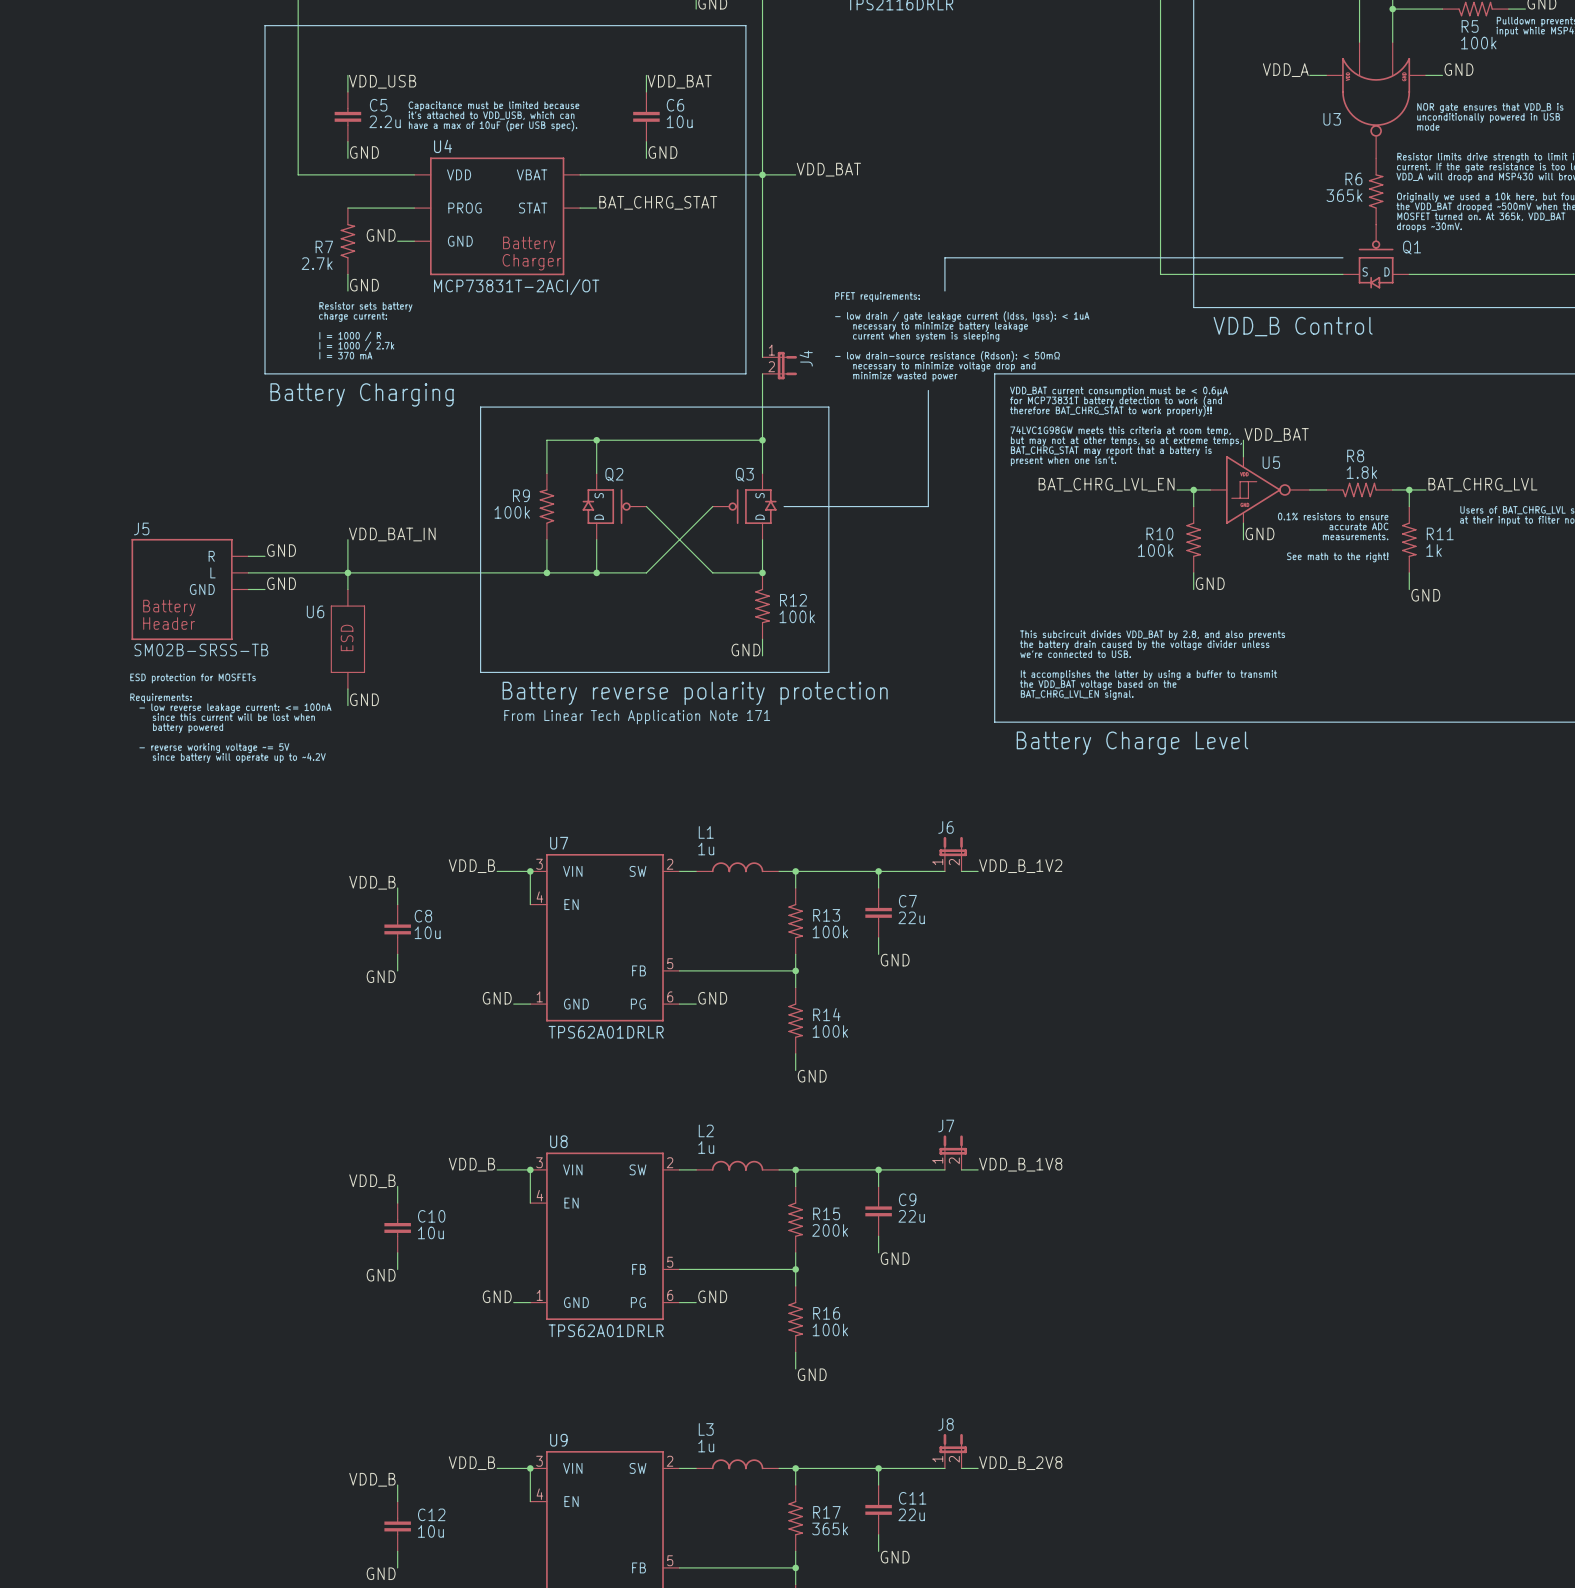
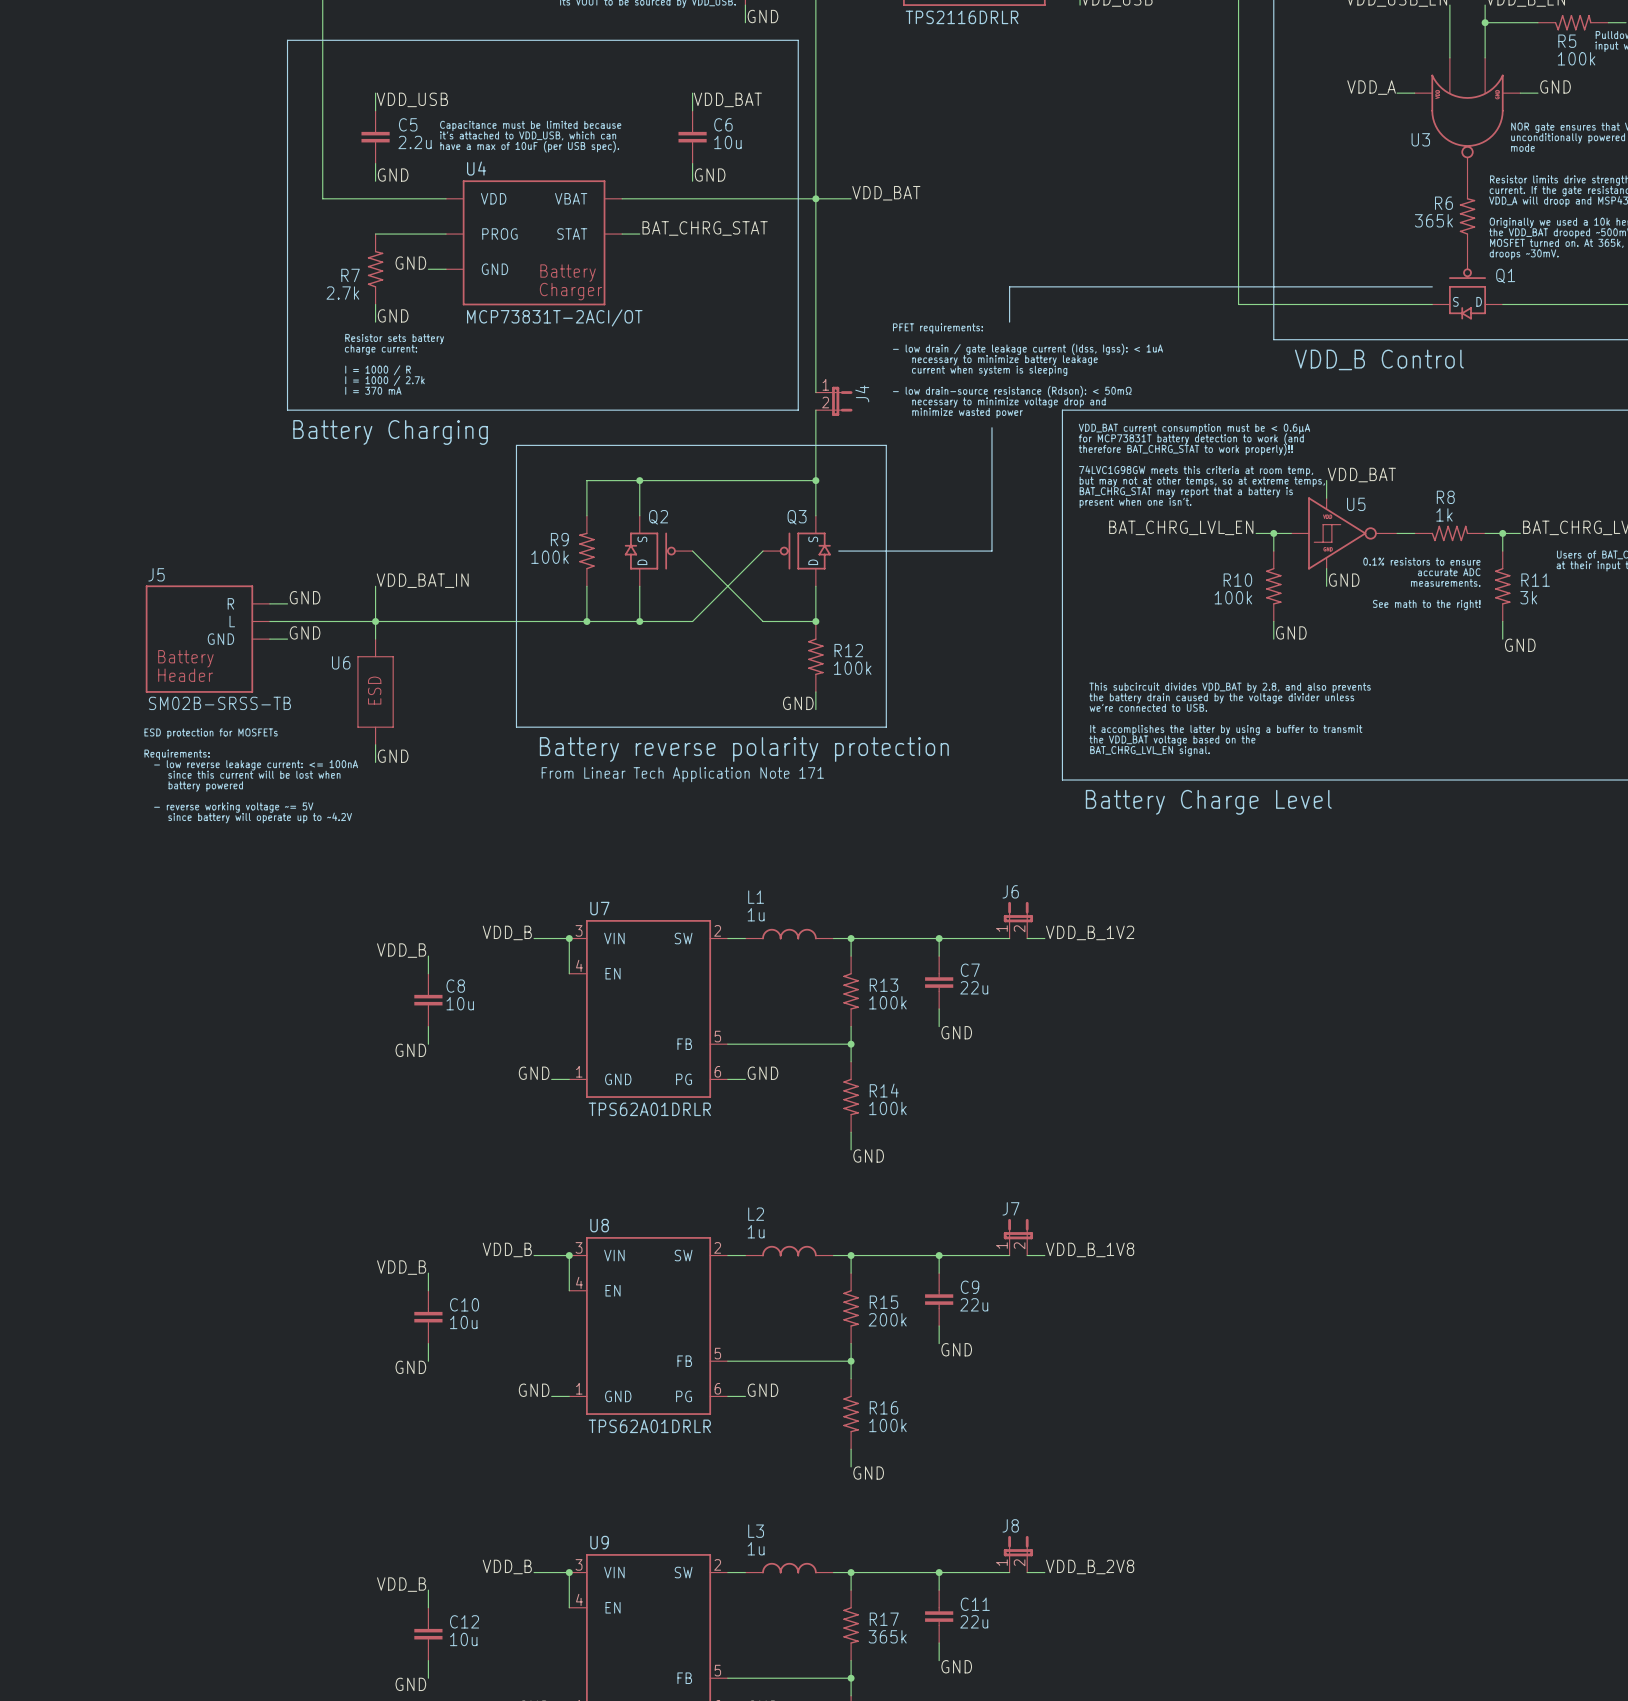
R8 value: 1.8k (1361, 472) -> 1k (1444, 514)
R11 value: 1k (1434, 550) -> 3k (1528, 597)

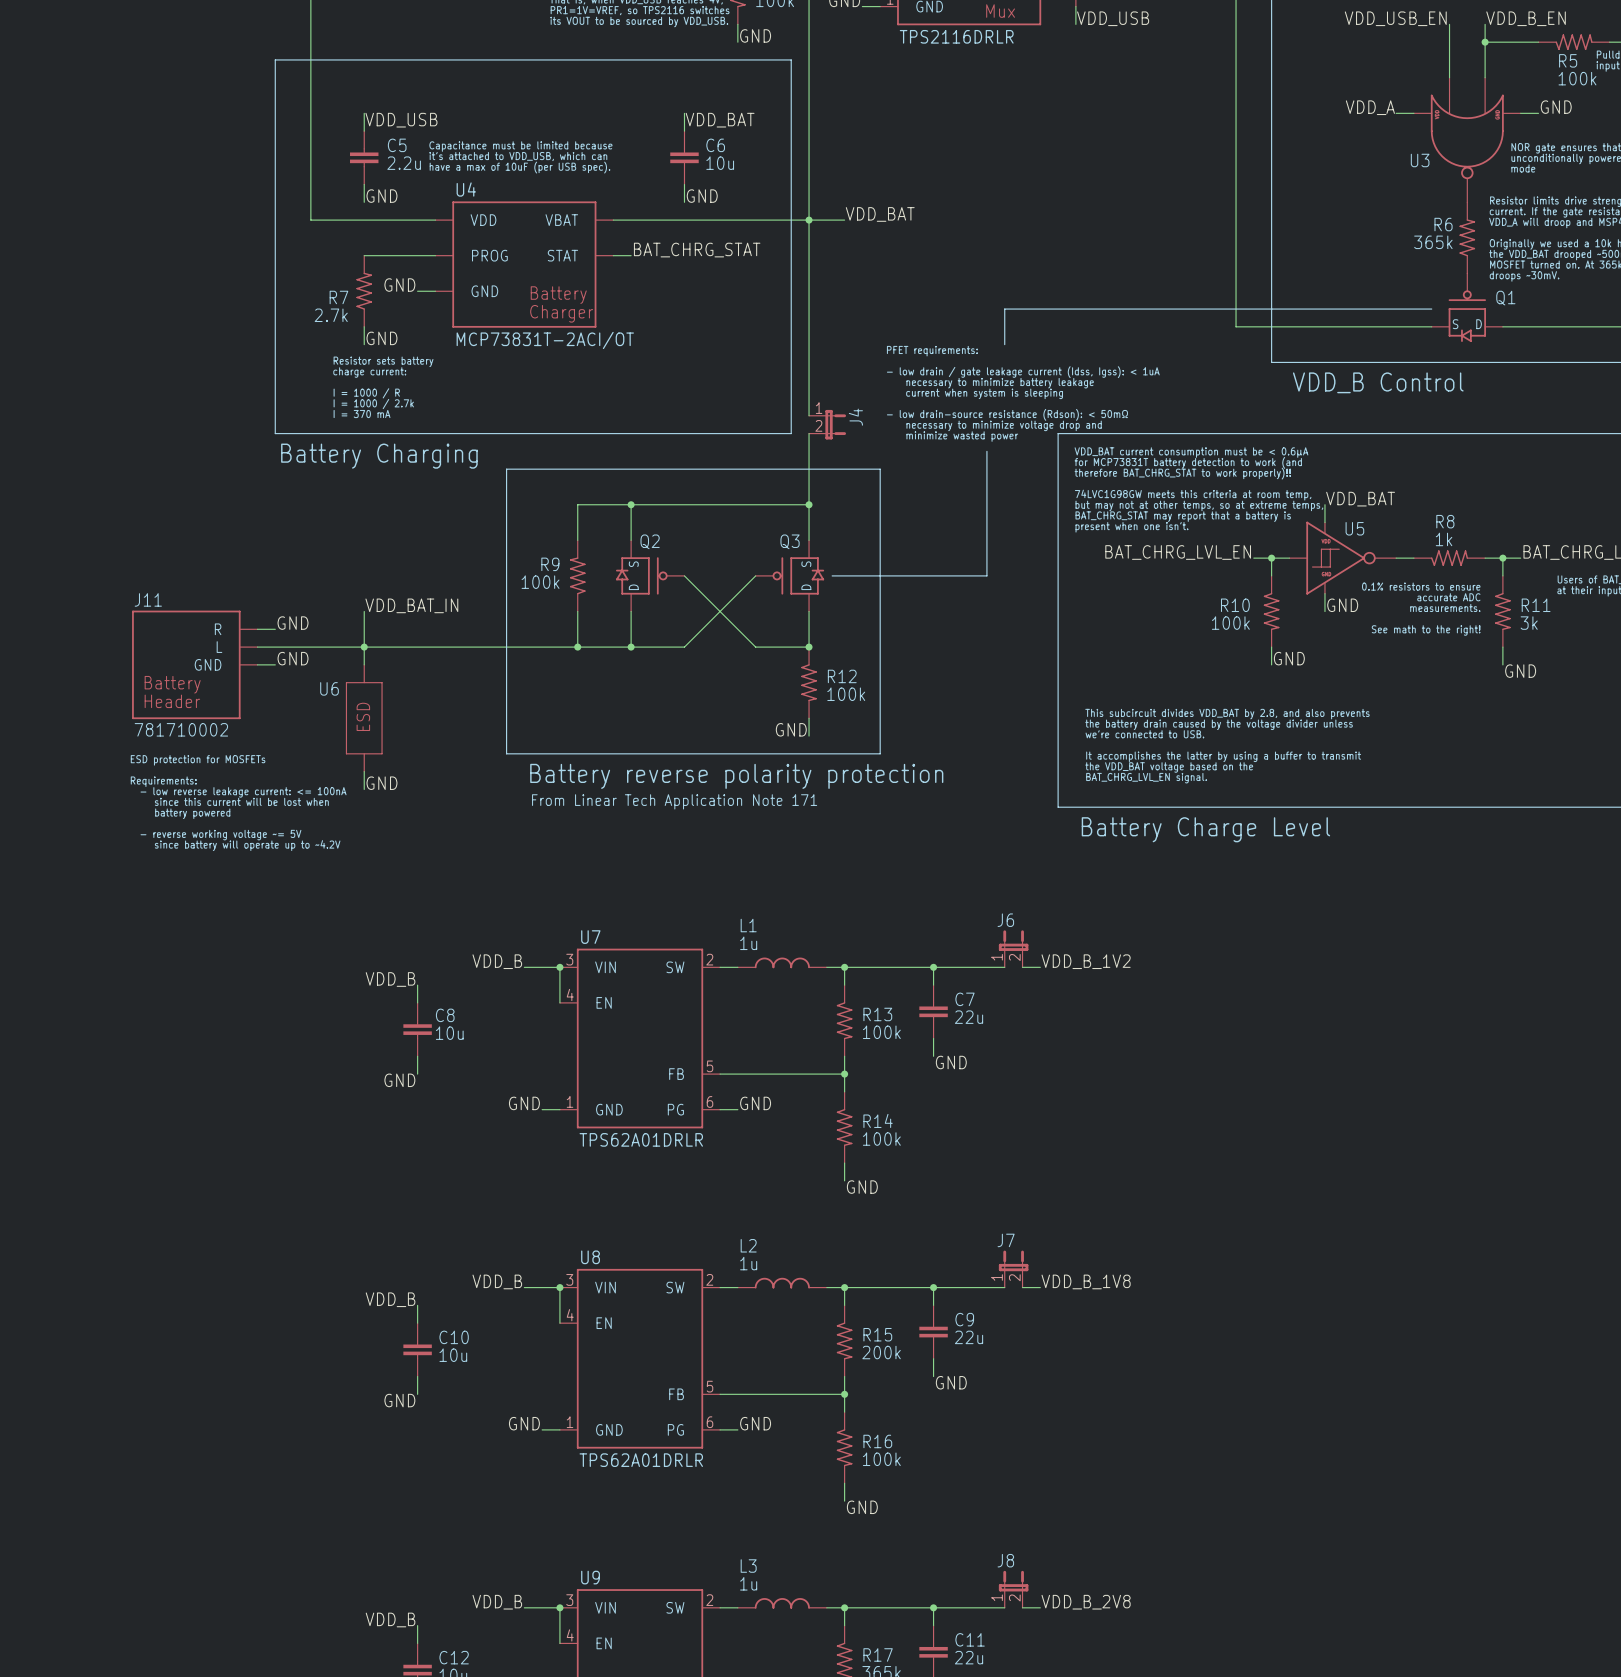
J5 name: J5 (156, 574) -> J11 (148, 599)
J5 text: SM02B-SRSS-TB (219, 703) -> 781710002 (181, 729)

